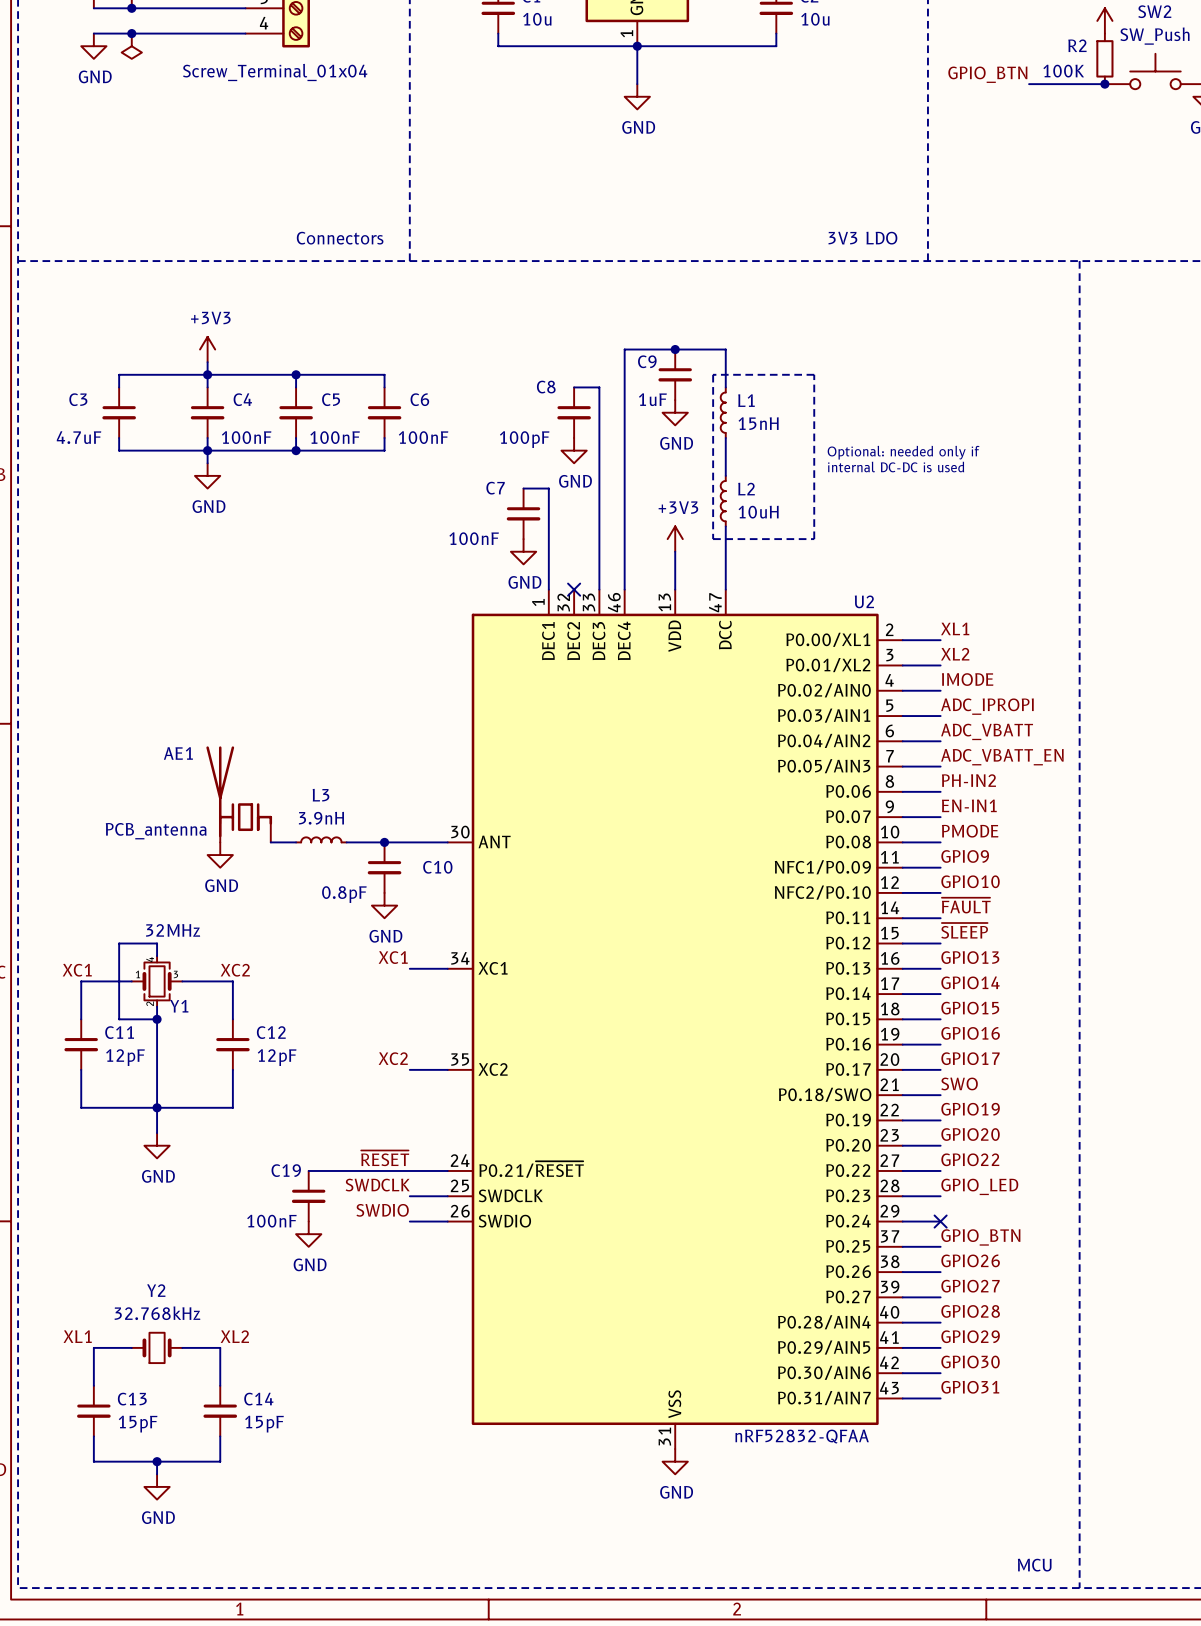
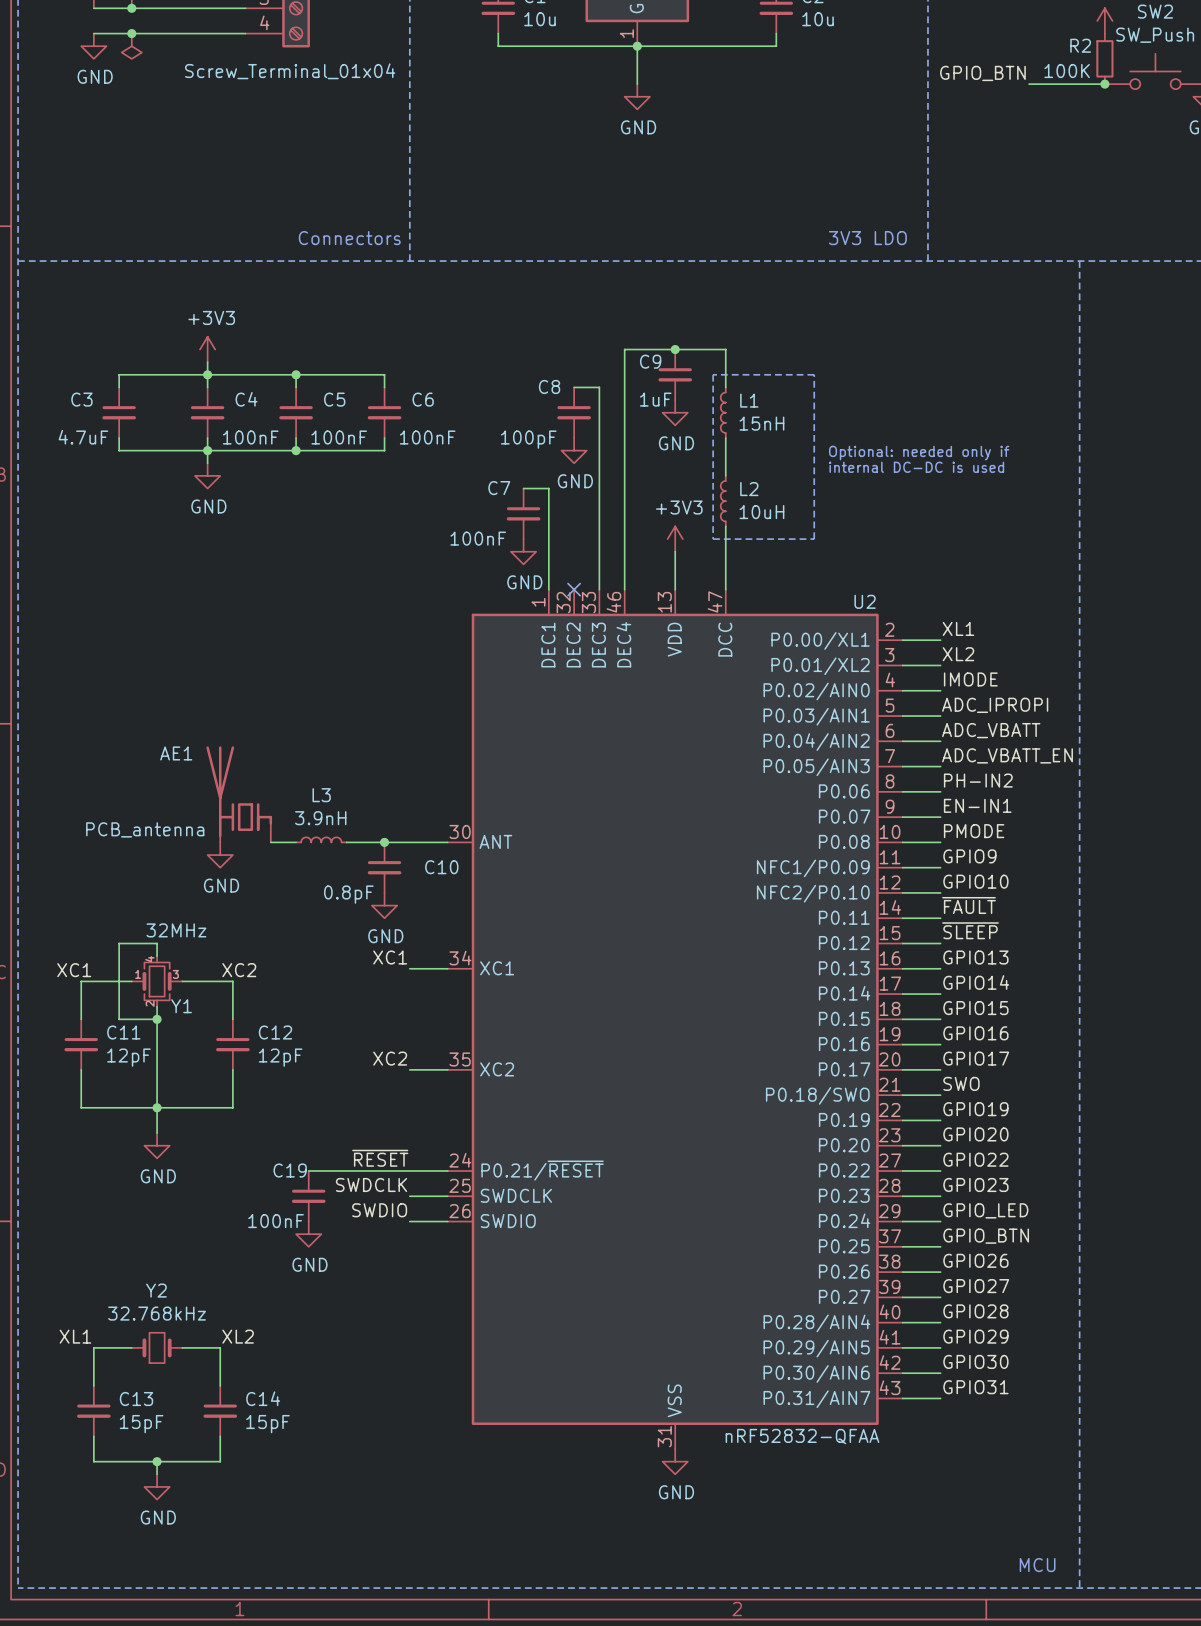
label: GPIO_LED (979, 1186) -> GPIO23 (975, 1184)
label: none -> GPIO_LED (985, 1210)
no-connect mark: (940, 1221) -> none

